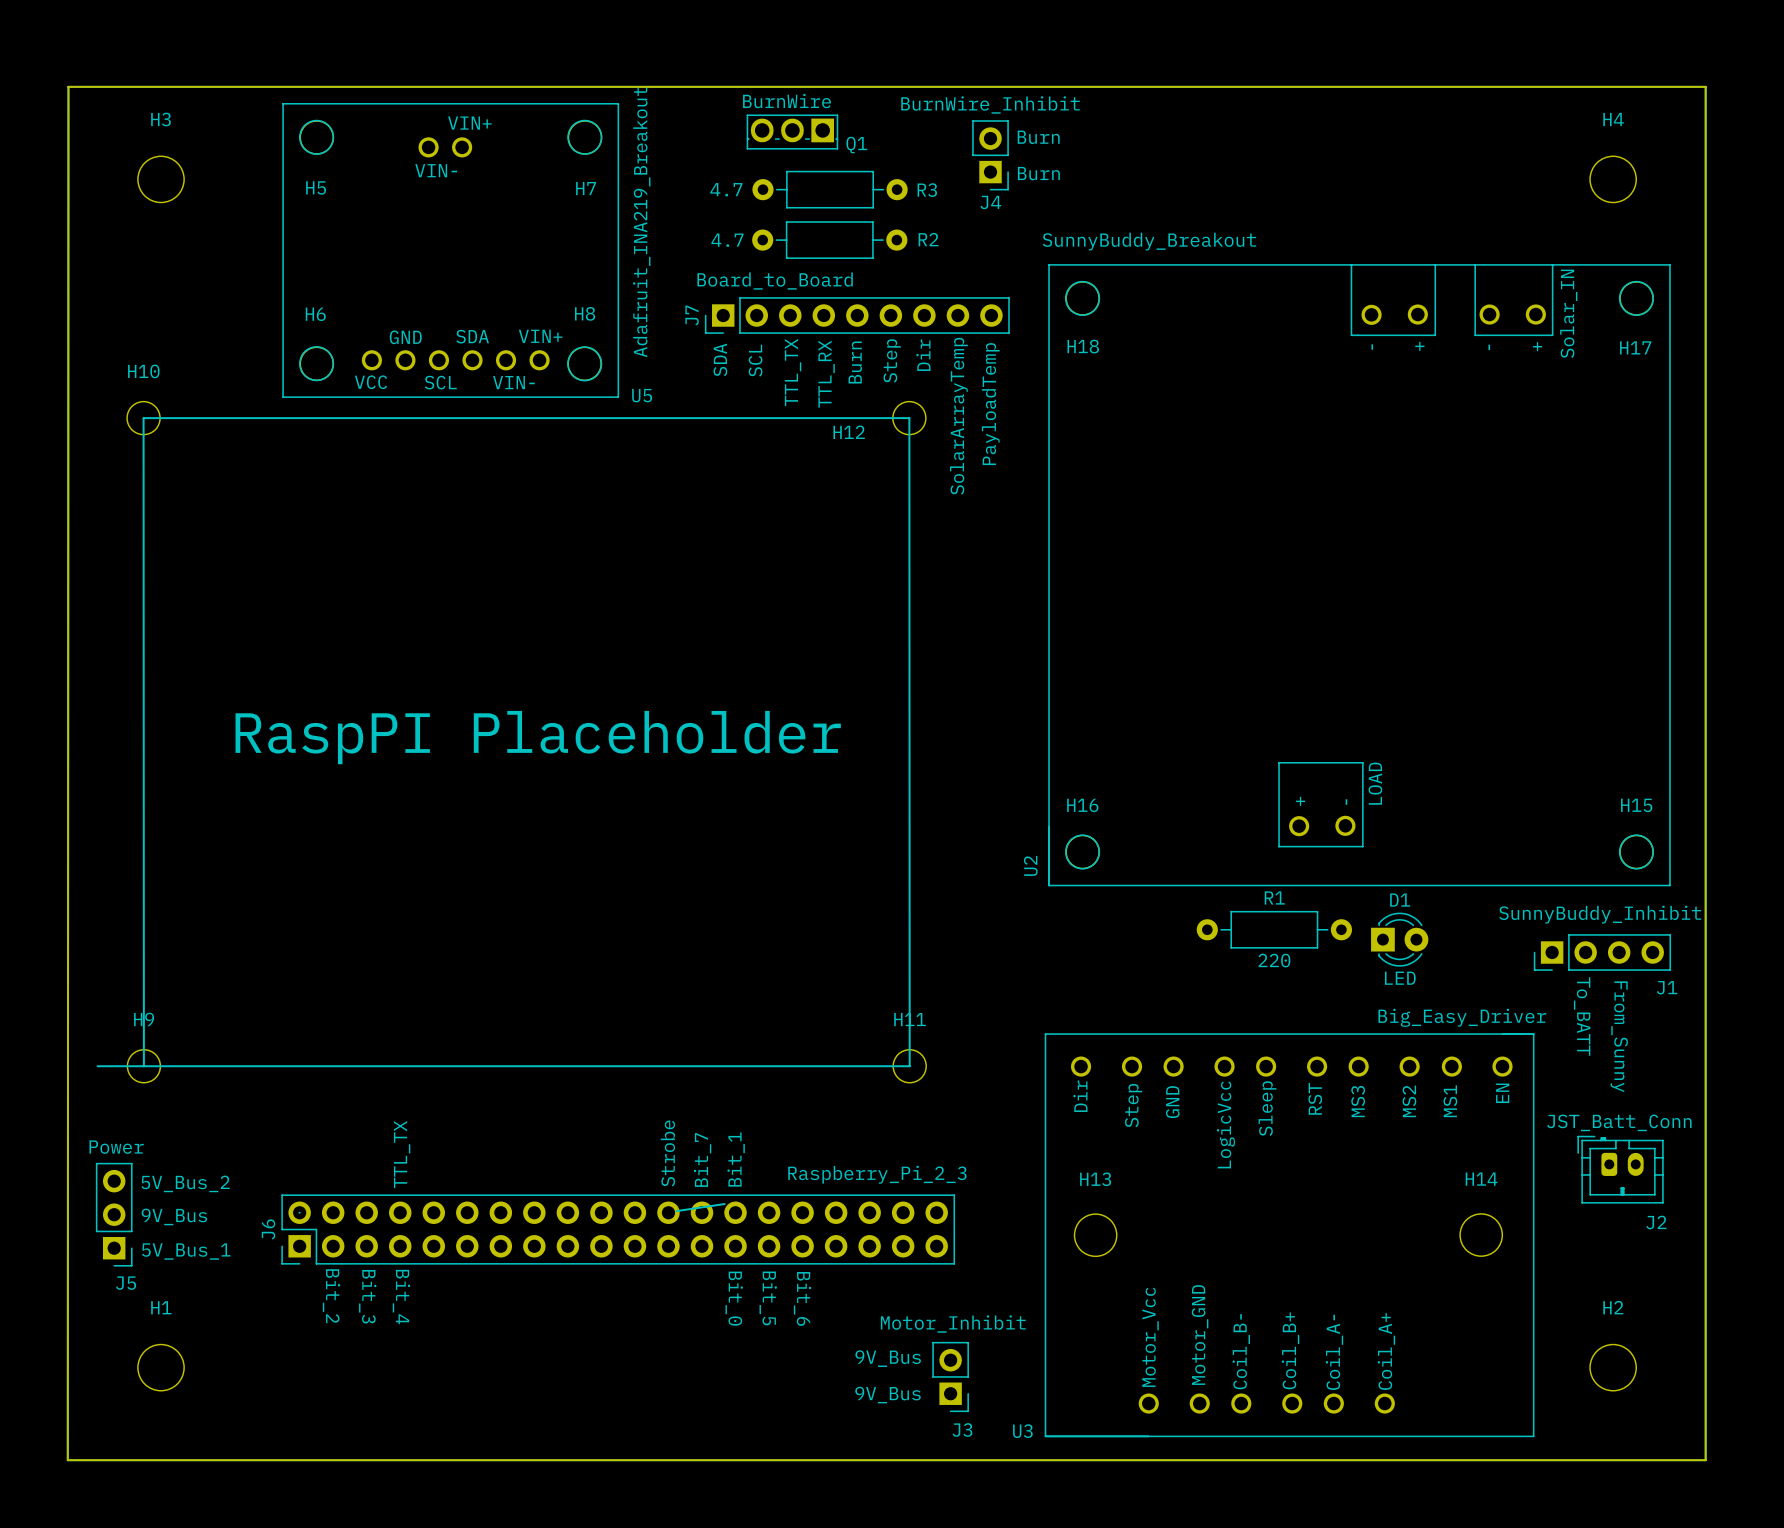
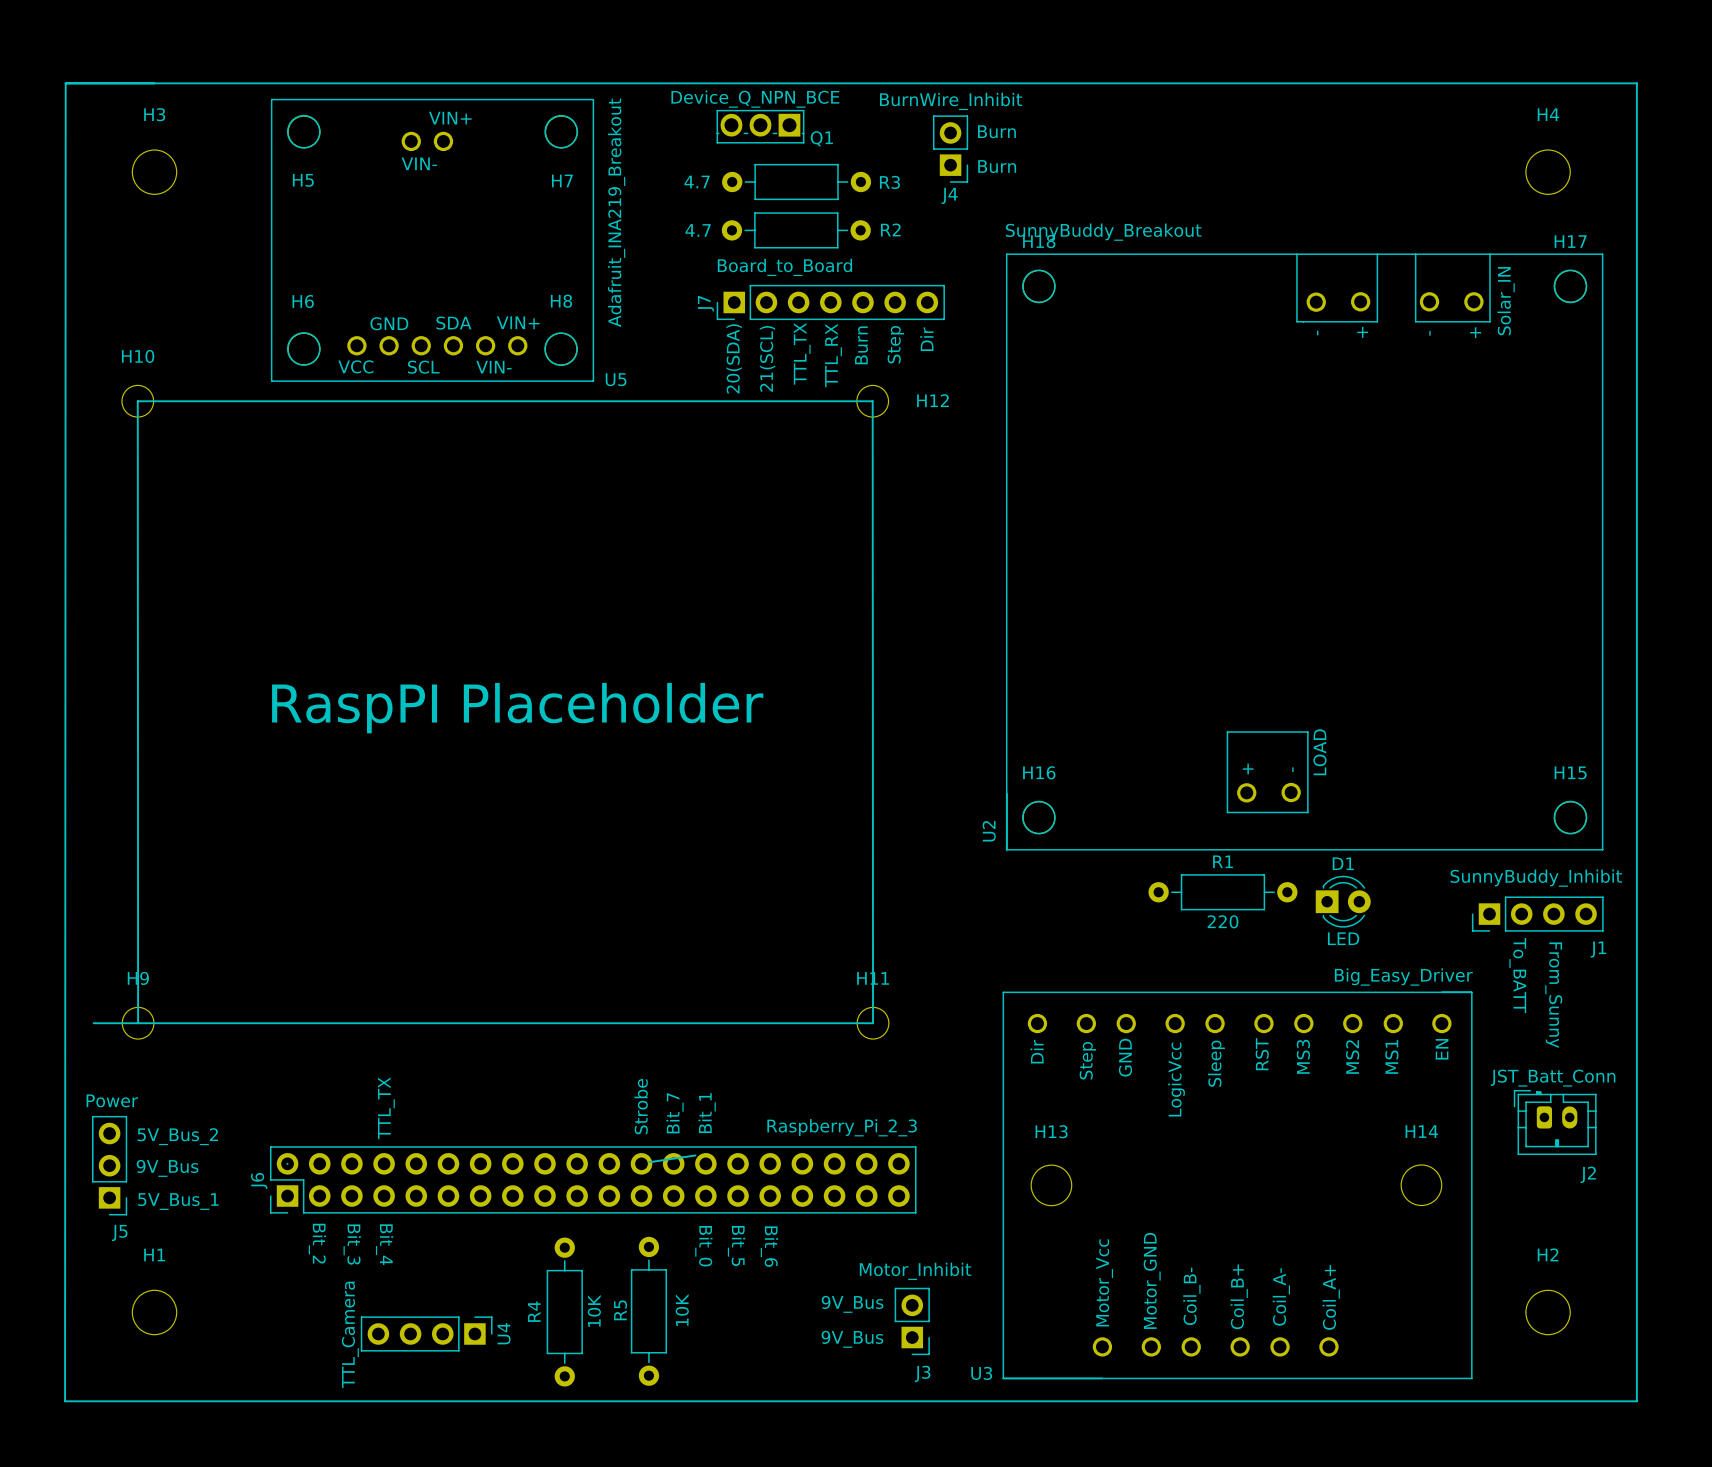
board edge: (68, 86) (67, 1460) (1705, 1460) (1705, 86) (68, 86) -> none
Q1 value: BurnWire (786, 101) -> Device_Q_NPN_BCE (755, 99)
J7 value position: Board_to_Board (775, 281) -> Board_to_Board (784, 267)
J7 footprint: [704, 297, 1010, 334] -> [716, 284, 945, 321]
J7 name position: J7 (692, 315) -> J7 (706, 303)
H18 name position: H18 (1083, 346) -> H18 (1039, 241)
H17 name position: H17 (1635, 347) -> H17 (1570, 241)
text position: Dir (923, 355) -> Dir (926, 339)
text: SDA (720, 359) -> none
text: SCL (755, 360) -> none
text position: Step (892, 360) -> Step (895, 344)
text position: Burn (855, 362) -> Burn (861, 345)
text position: TTL_TX (793, 372) -> TTL_TX (802, 353)
text position: TTL_RX (826, 374) -> TTL_RX (833, 355)
text: none -> 20(SDA) (734, 358)
text: none -> 21(SCL) (767, 358)
text: PayloadTemp (990, 404) -> none
text: SolarArrayTemp (958, 416) -> none
H12 name position: H12 (849, 432) -> H12 (932, 400)
R5: none -> 10K (648, 1311)
R4: none -> 10K (564, 1312)
U4: none -> TTL_Camera (426, 1333)

